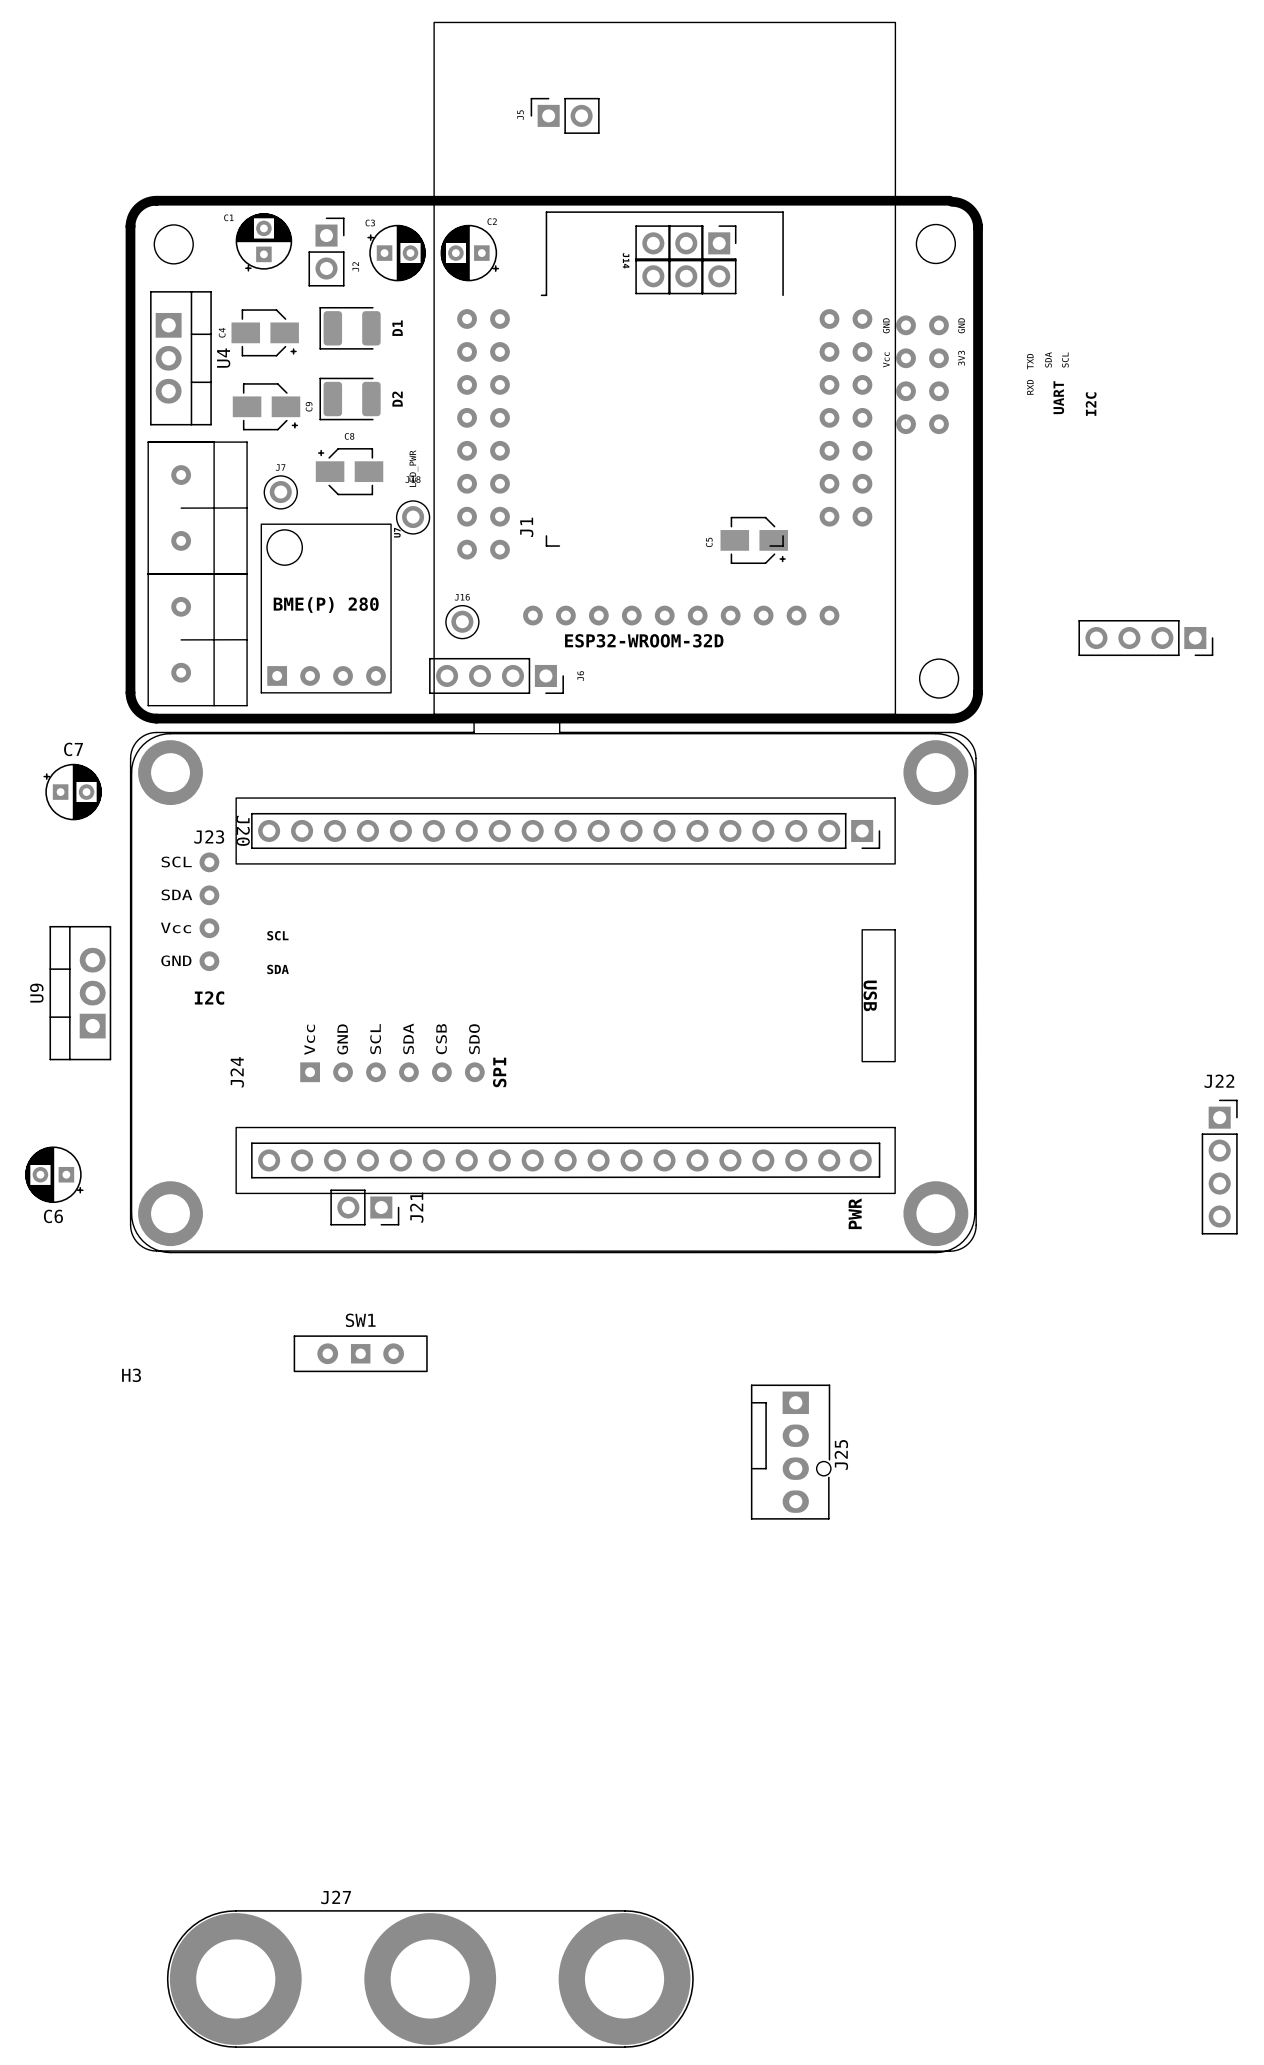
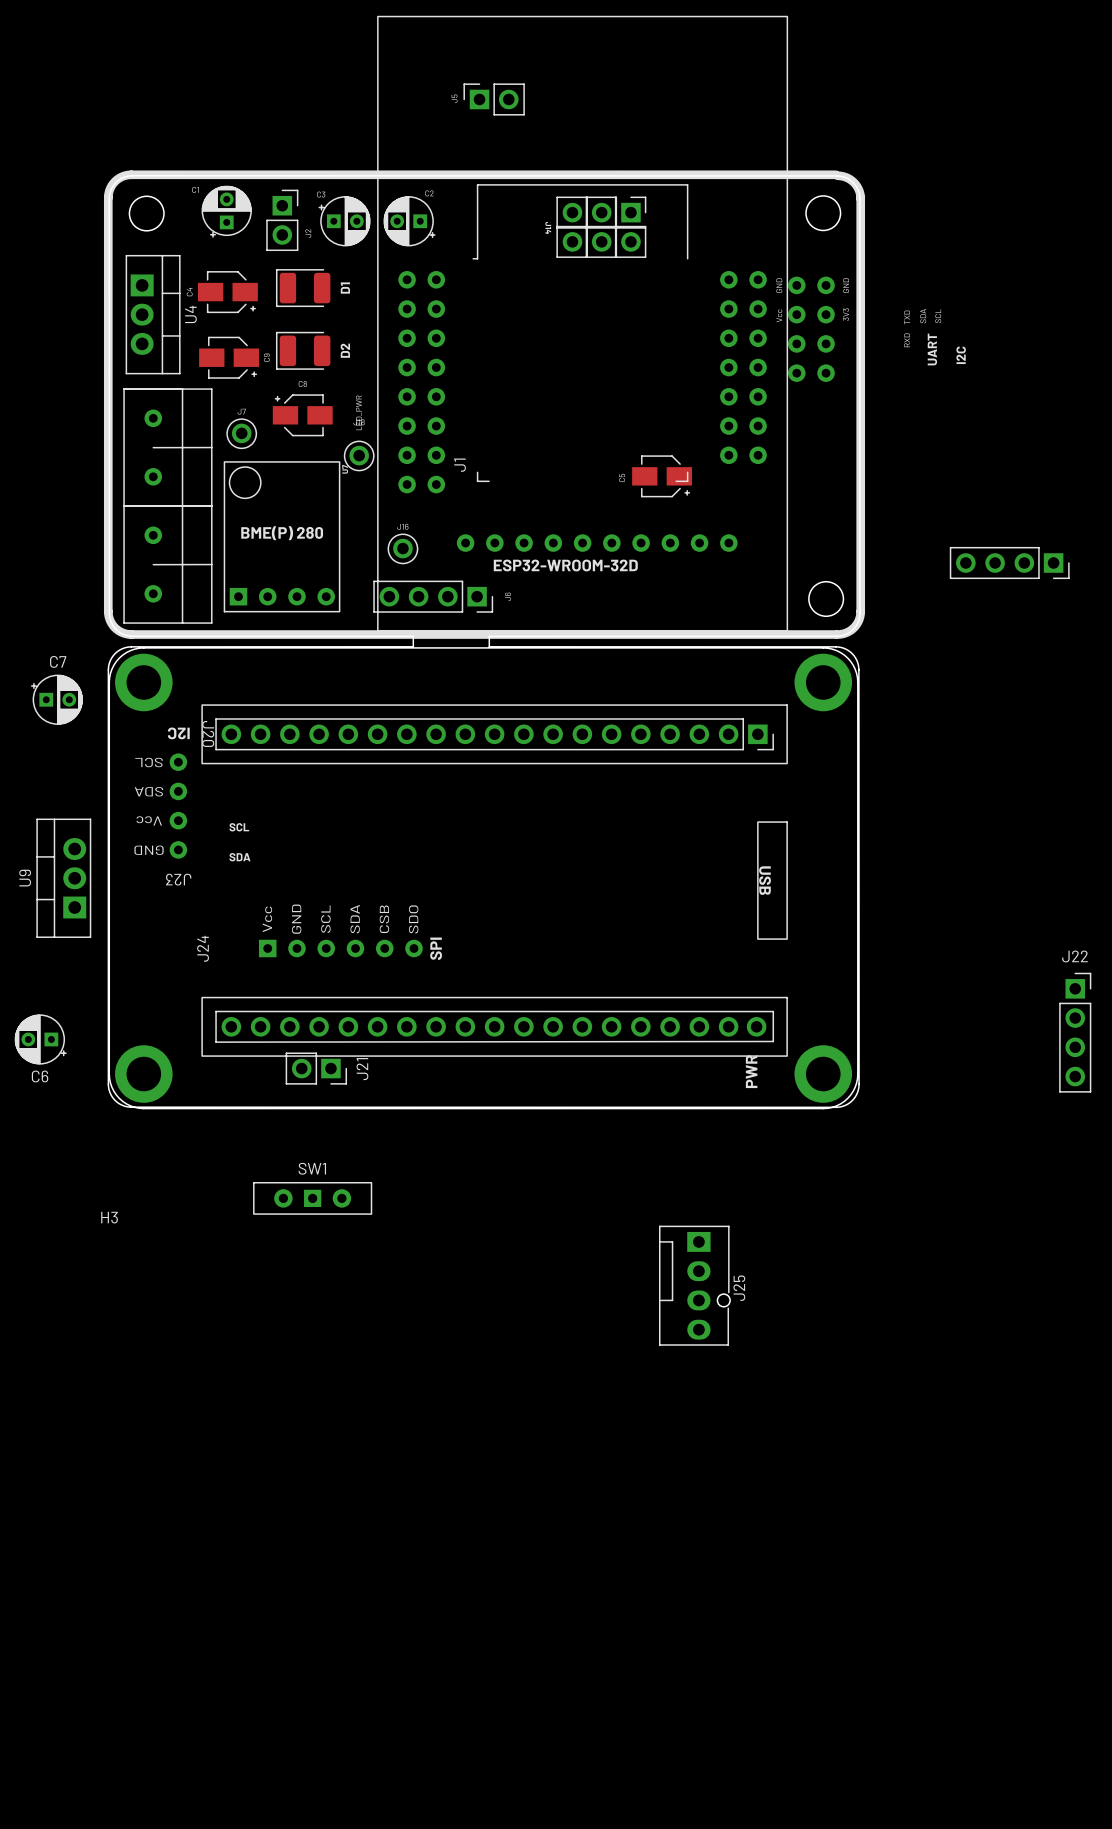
J23 name position: J23 (209, 836) -> J23 (178, 879)
J23 footprint: [199, 852, 220, 972] -> [169, 753, 188, 859]
J27: (430, 1979) -> none

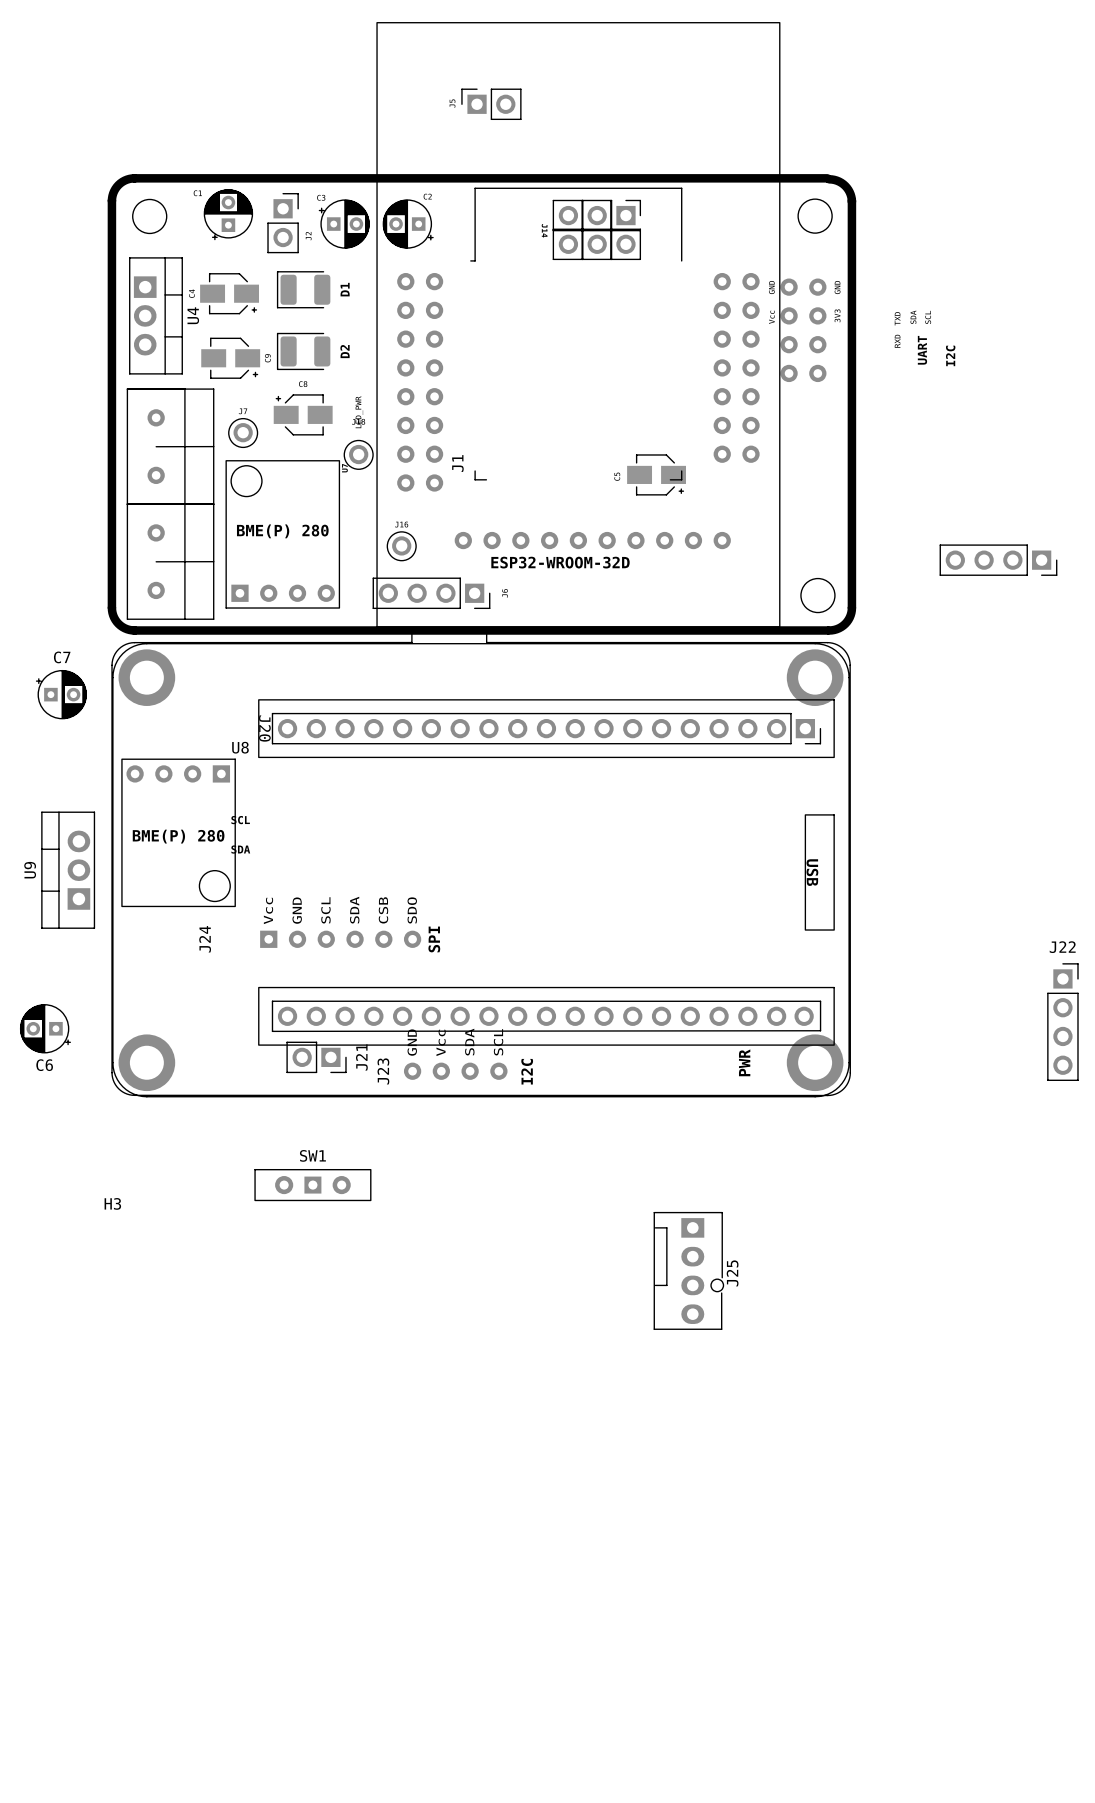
J23 rotation: 0° (178, 806) -> 90° clockwise (455, 1071)
J23 position: (178, 806) -> (455, 1071)
U8: none -> (178, 832)
J20 position: (494, 880) -> (546, 872)

